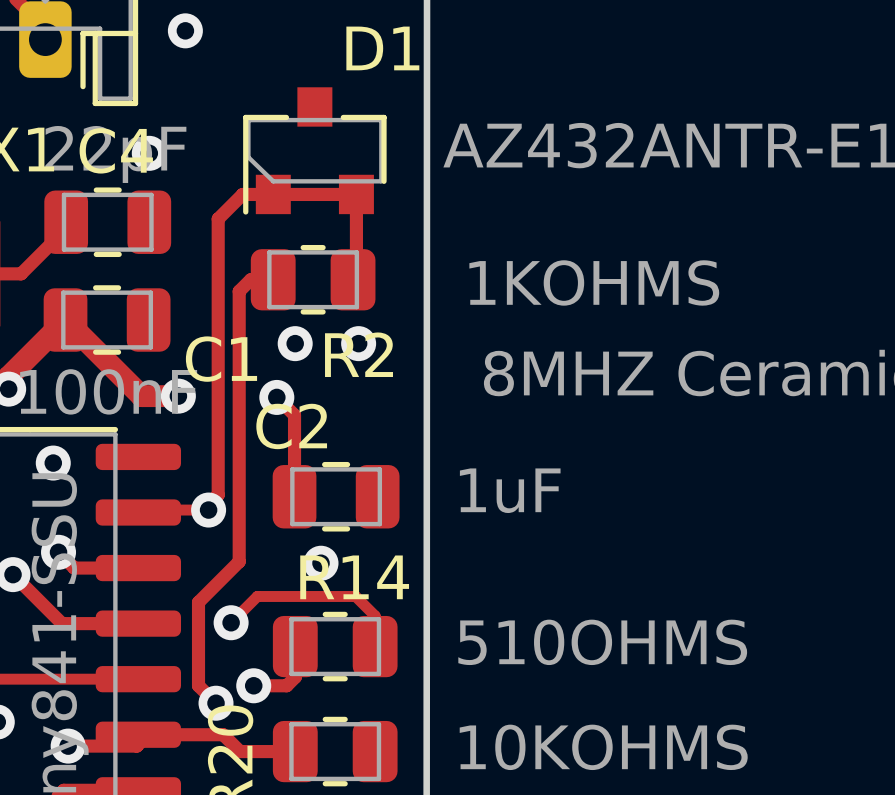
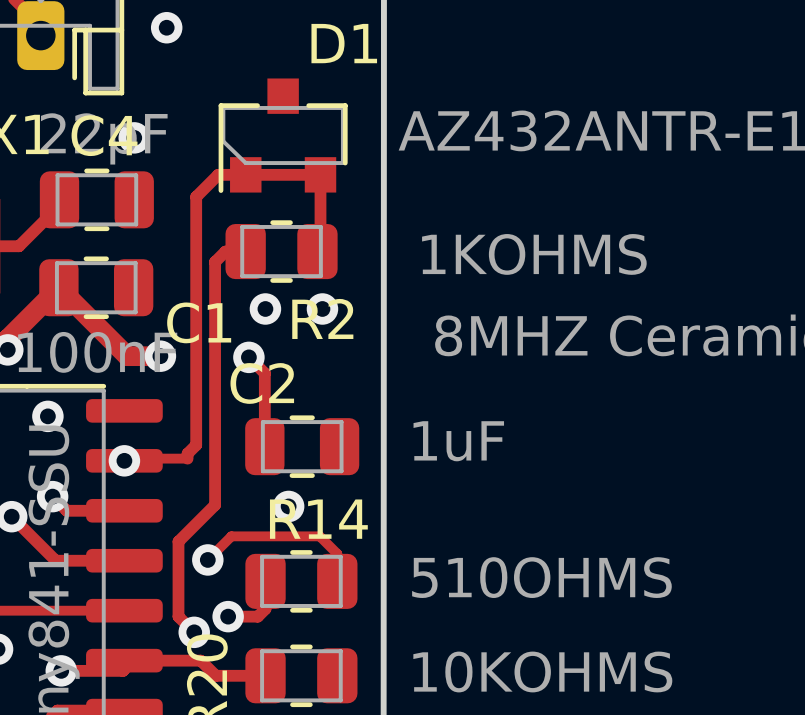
via position: (208, 510) -> (124, 460)

